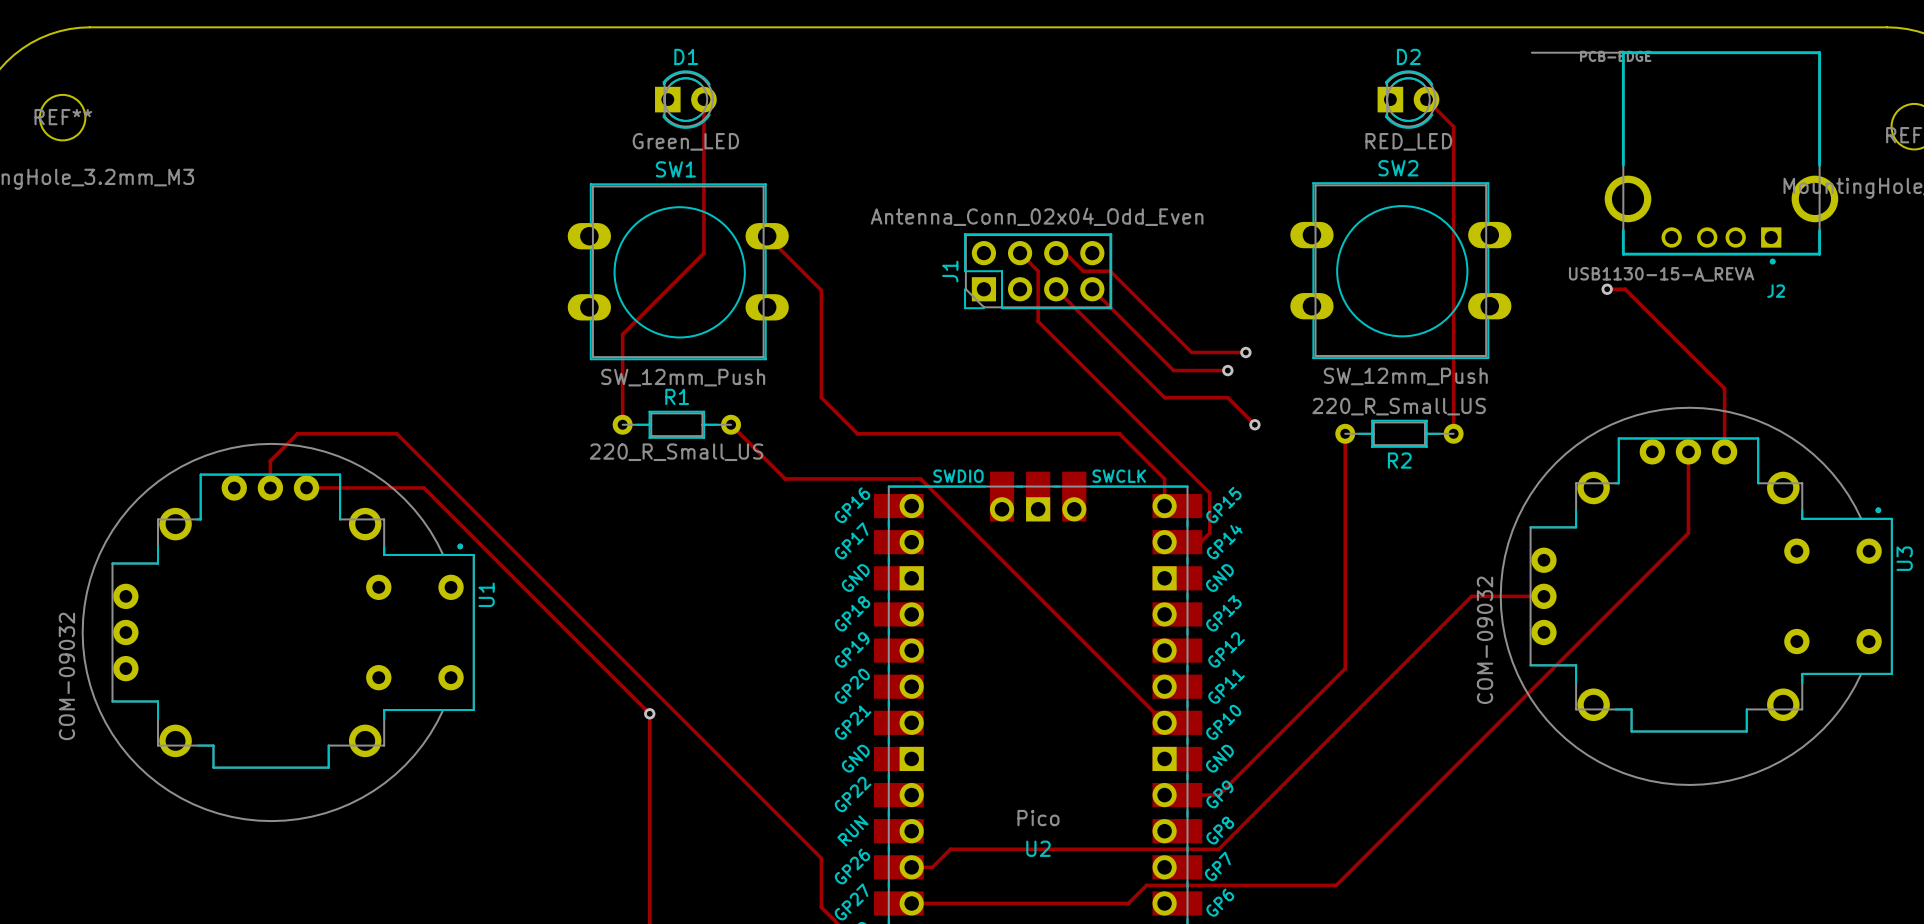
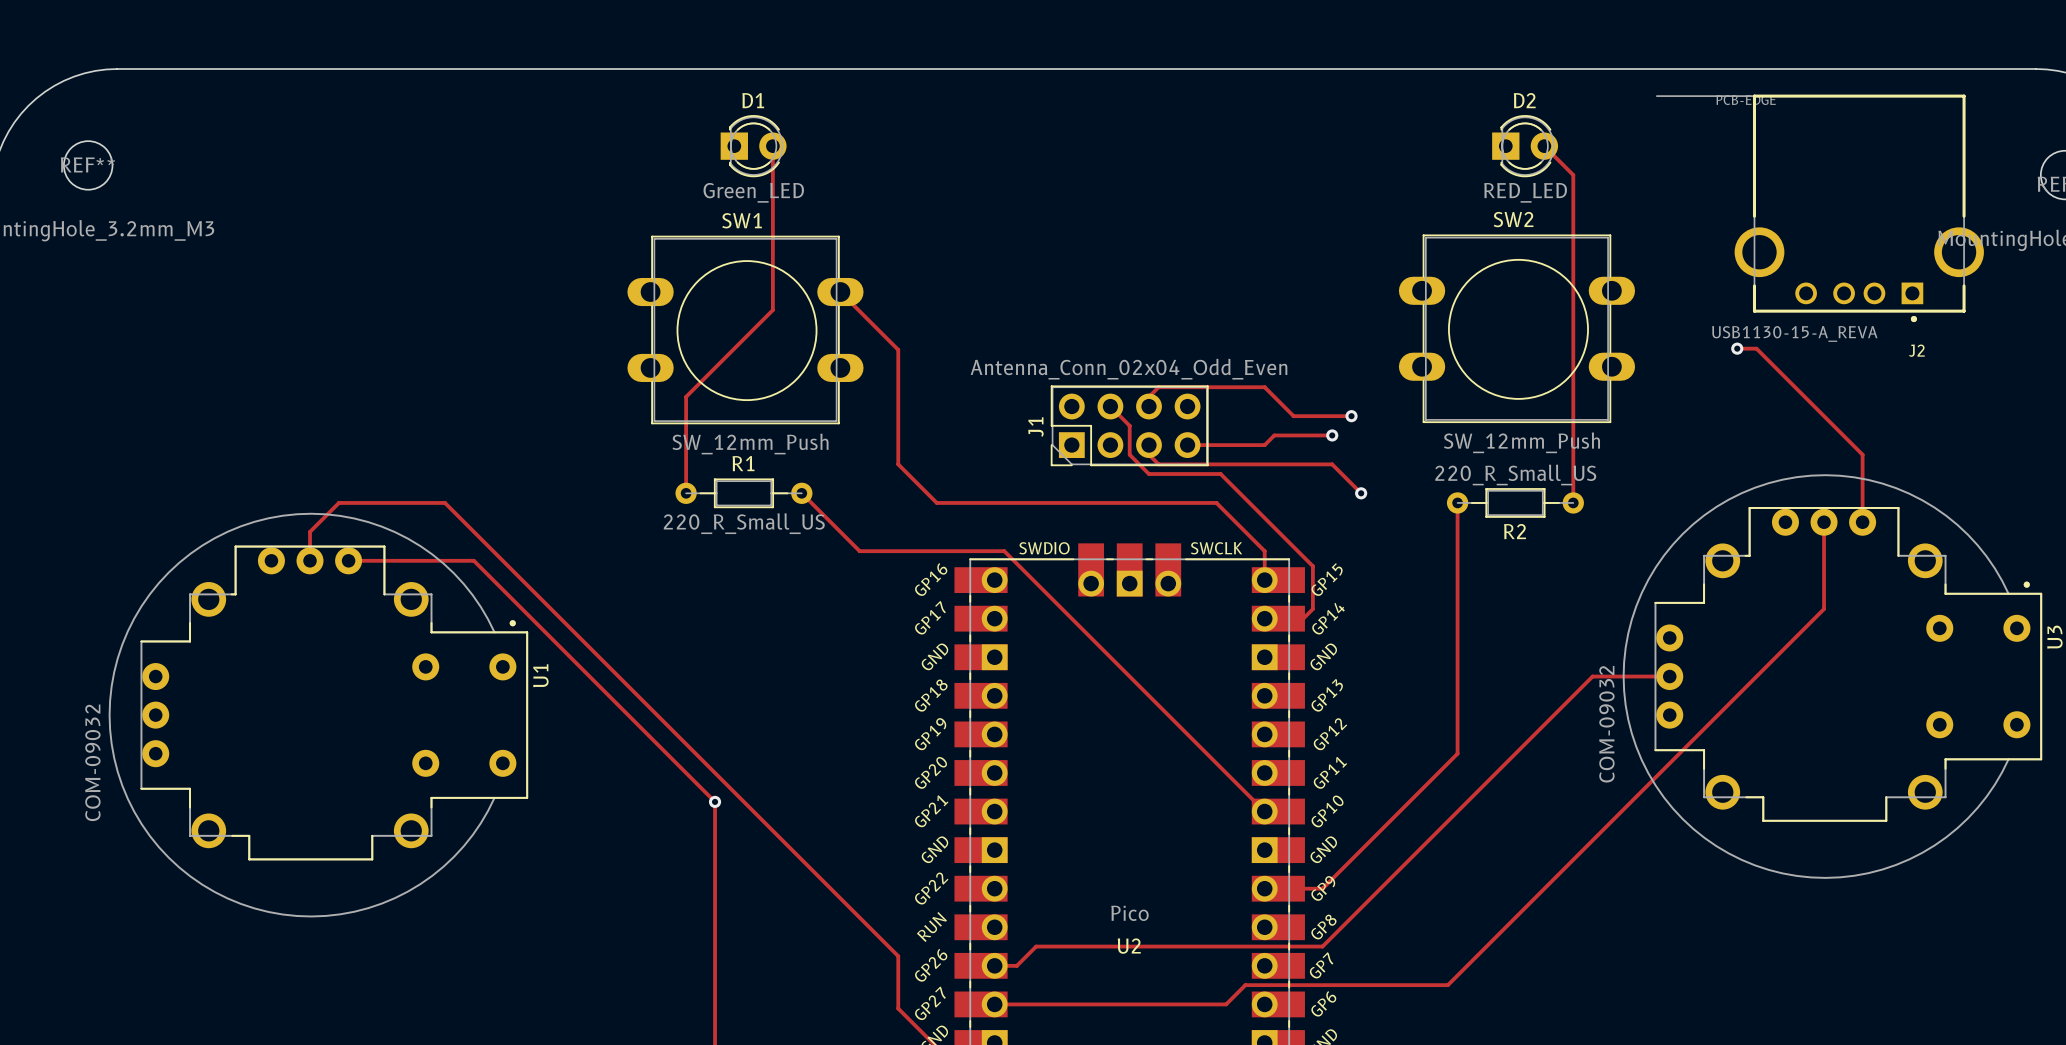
track: (1020, 253) (1038, 271) (1038, 321) (1123, 406) -> (1110, 406) (1129, 425) (1129, 454) (1148, 474) (1220, 474)
track: (1056, 253) (1065, 253) (1083, 271) (1110, 271) (1164, 325) -> (1148, 406) (1148, 396) (1158, 387) (1264, 387)
J1 position: (1038, 271) -> (1129, 425)
track: (1056, 289) (1164, 397) -> (1148, 445) (1148, 454) (1158, 464) (1264, 464)
track: (1092, 289) (1173, 370) -> (1187, 445) (1264, 445) (1274, 435)

